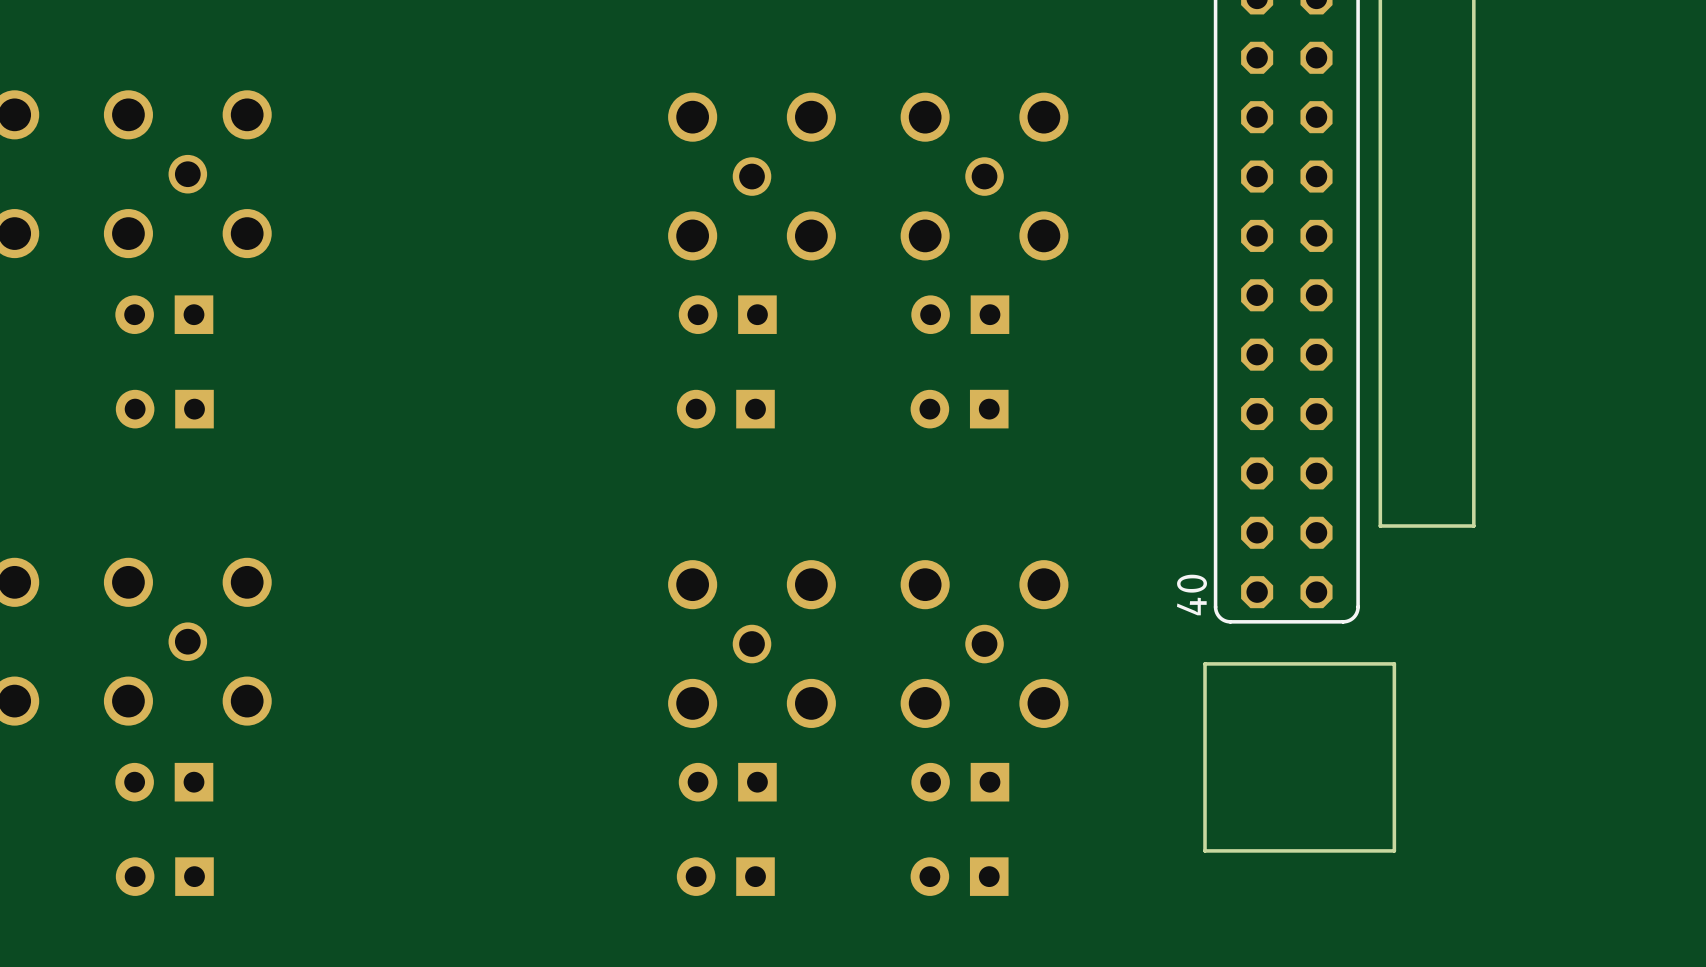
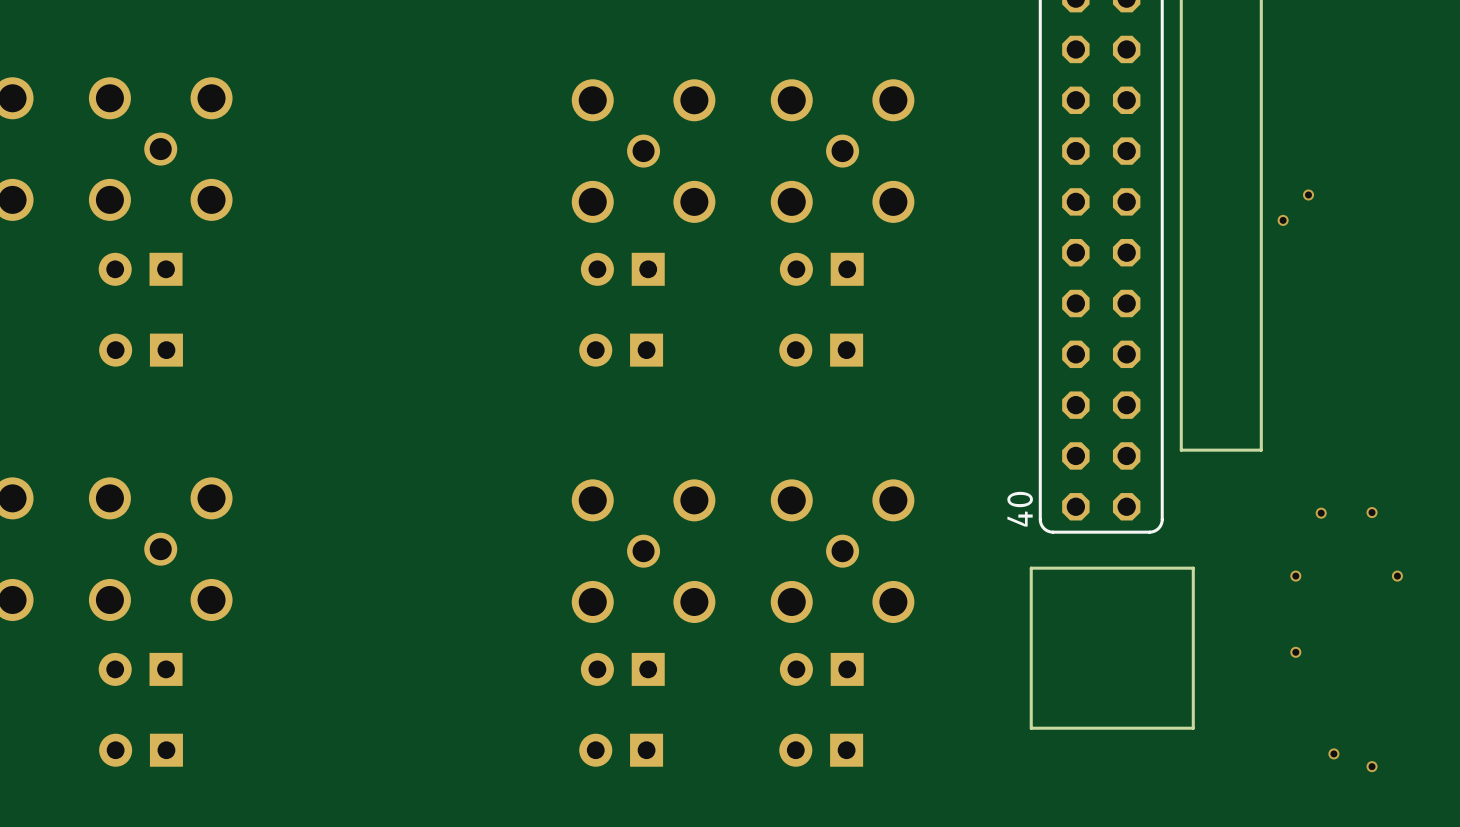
via: none -> (1308, 194)
via: none -> (1283, 220)
via: none -> (1372, 512)
via: none -> (1321, 513)
via: none -> (1295, 576)
via: none -> (1397, 576)
via: none -> (1295, 652)
via: none -> (1333, 753)
via: none -> (1372, 766)

